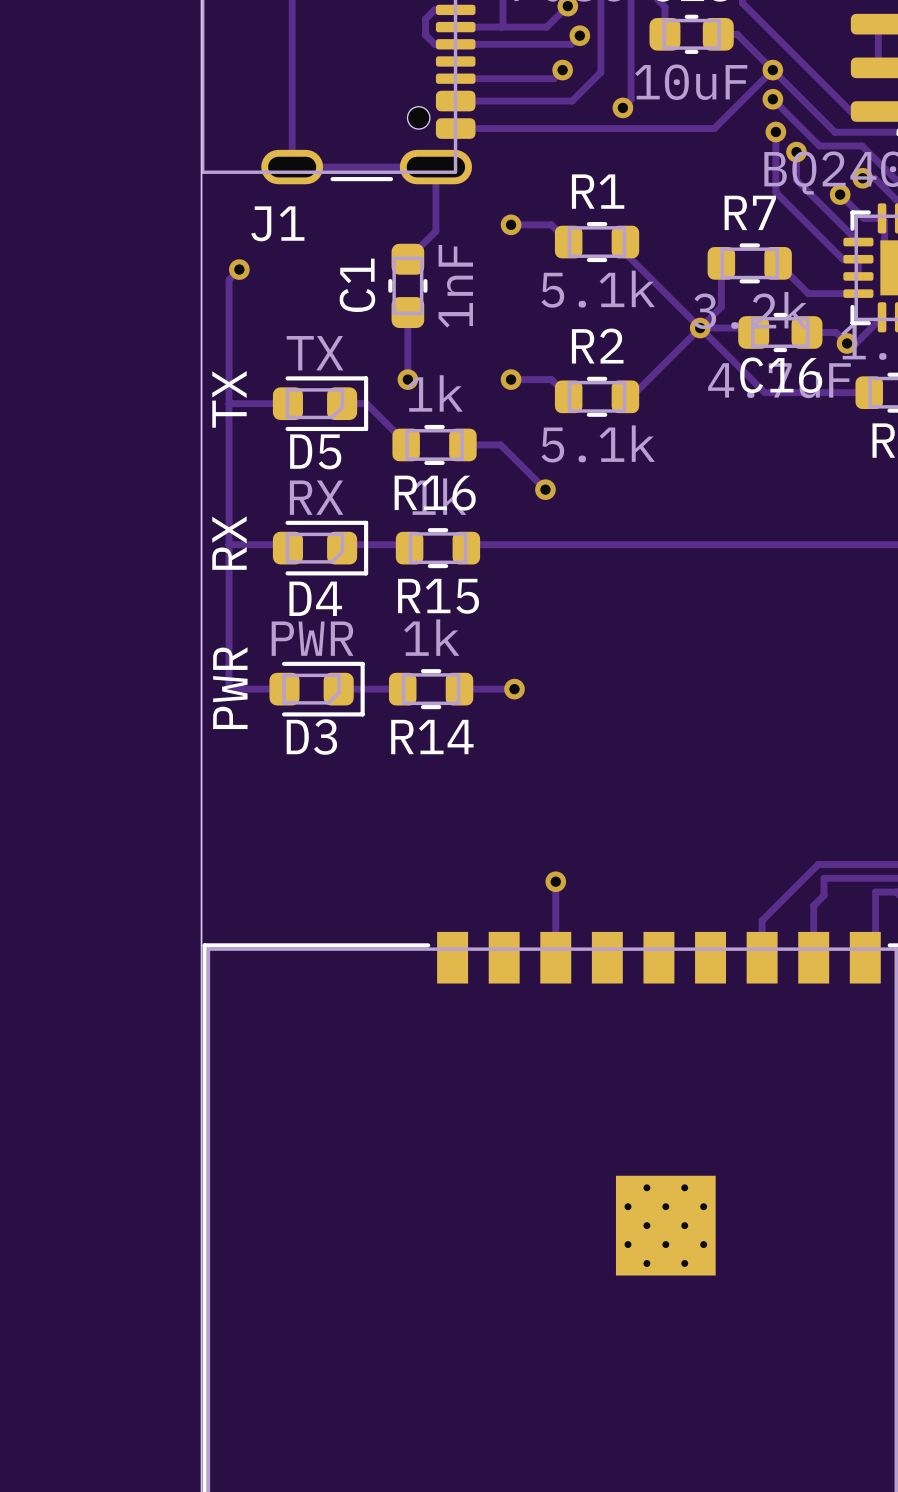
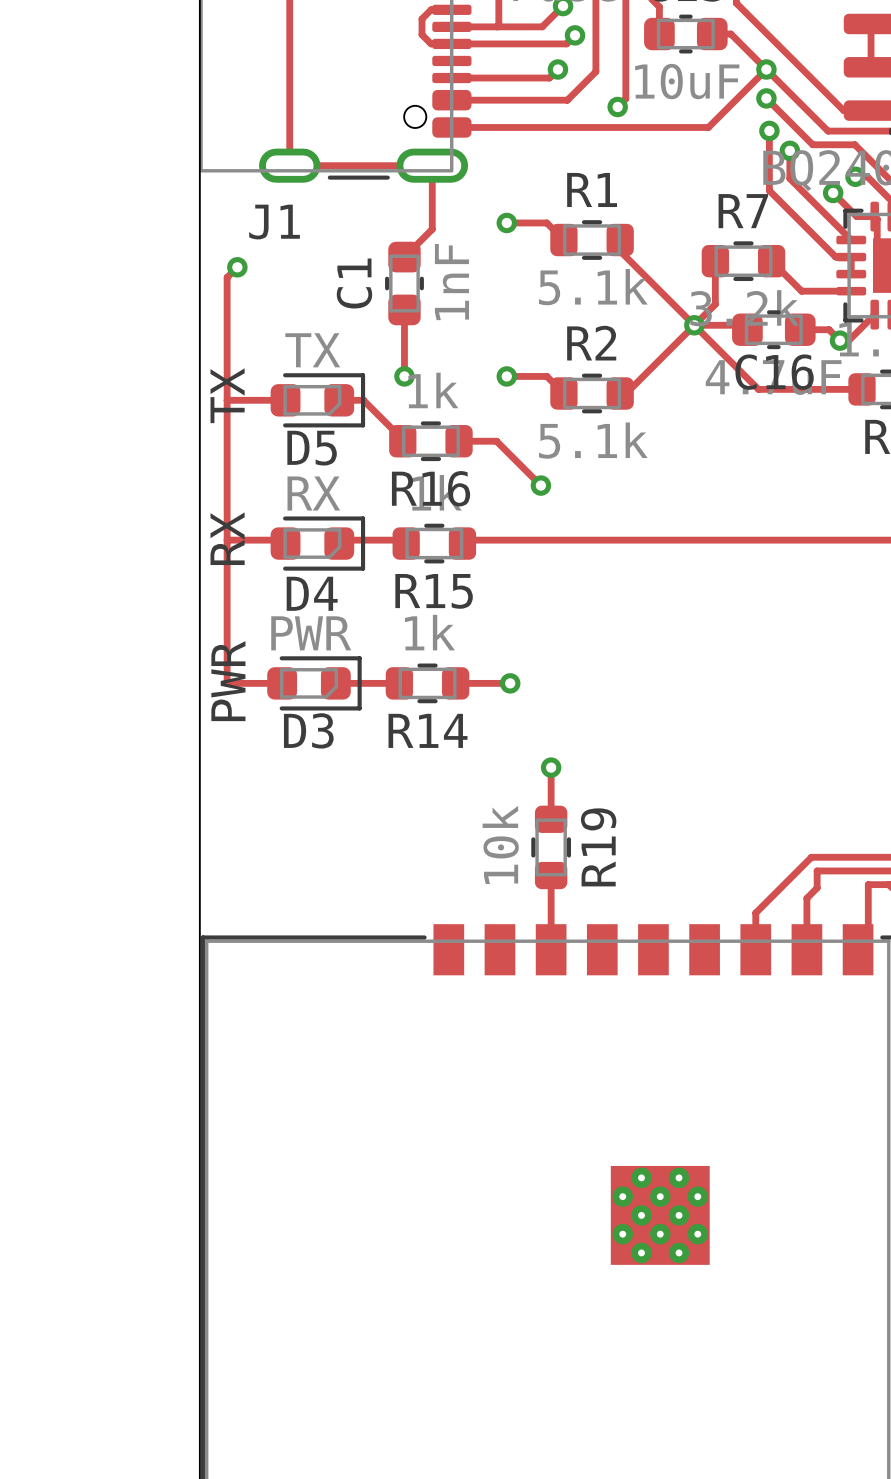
track: none -> (551, 767) (551, 819)
R19: none -> 10k (551, 847)
via position: (555, 881) -> (551, 767)

